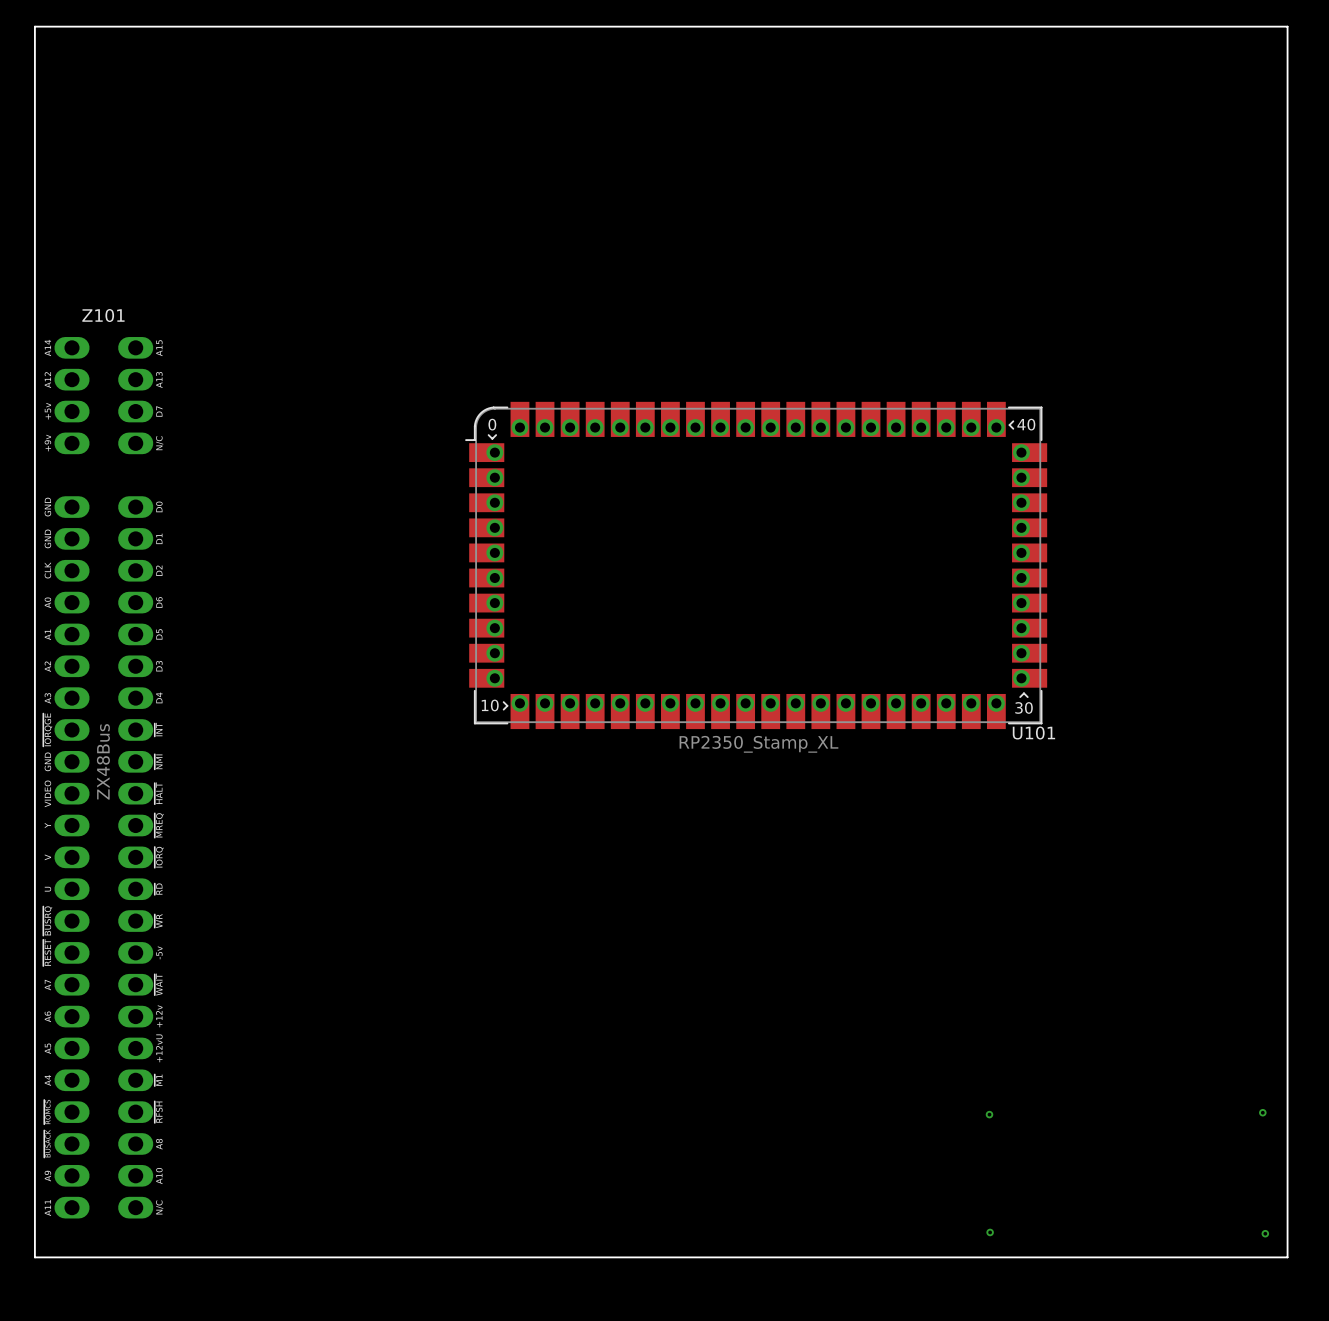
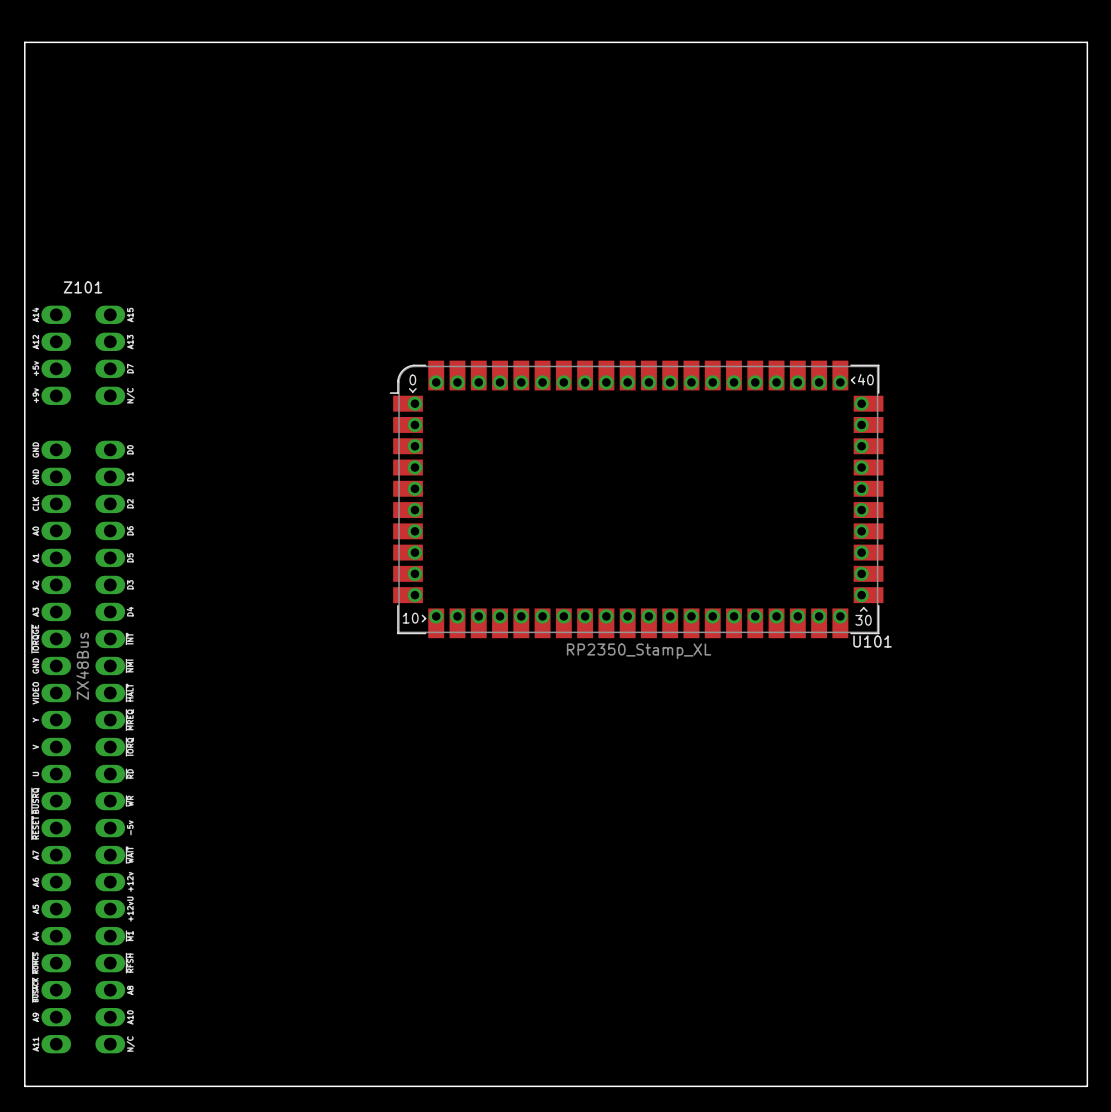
via: (1262, 1112) -> none
via: (989, 1114) -> none
via: (990, 1232) -> none
via: (1265, 1233) -> none

